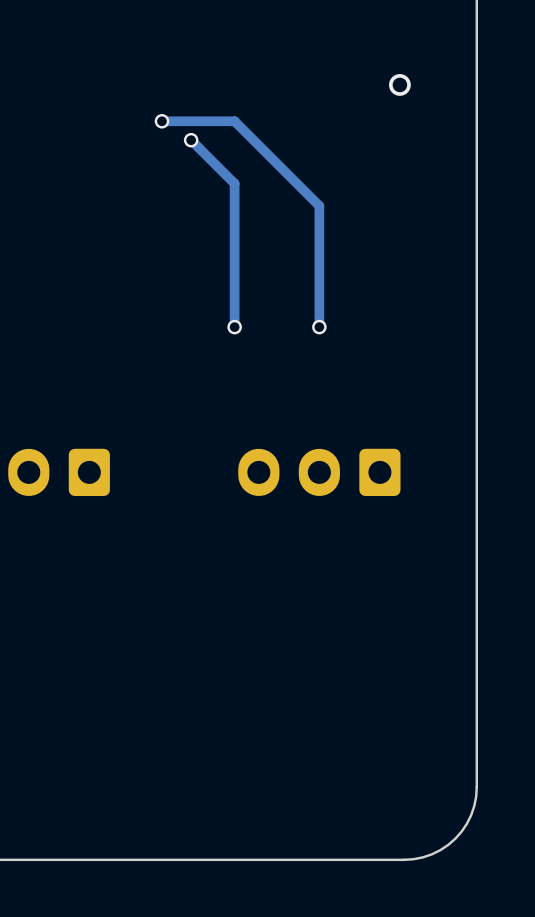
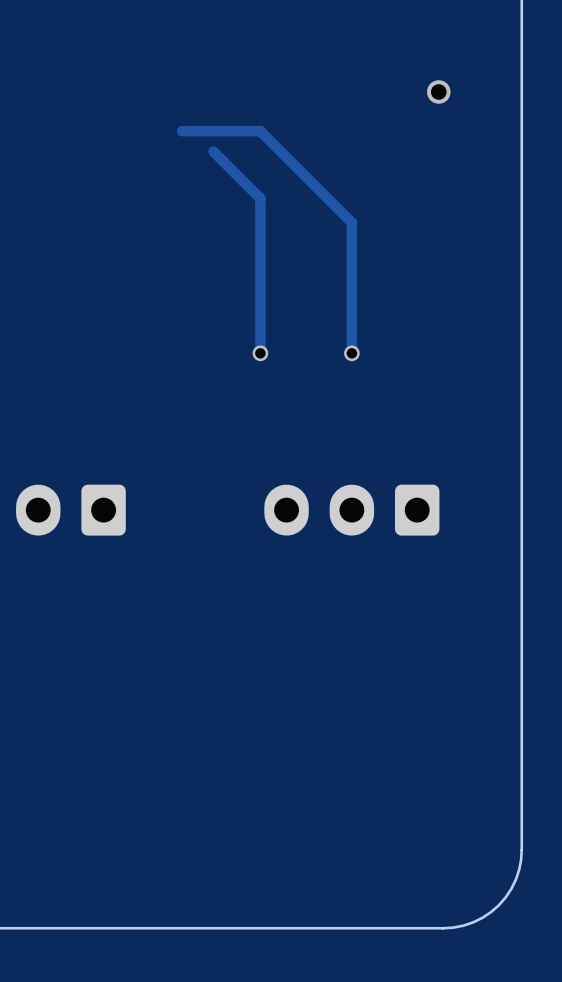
via: (161, 121) -> none
via: (191, 140) -> none

